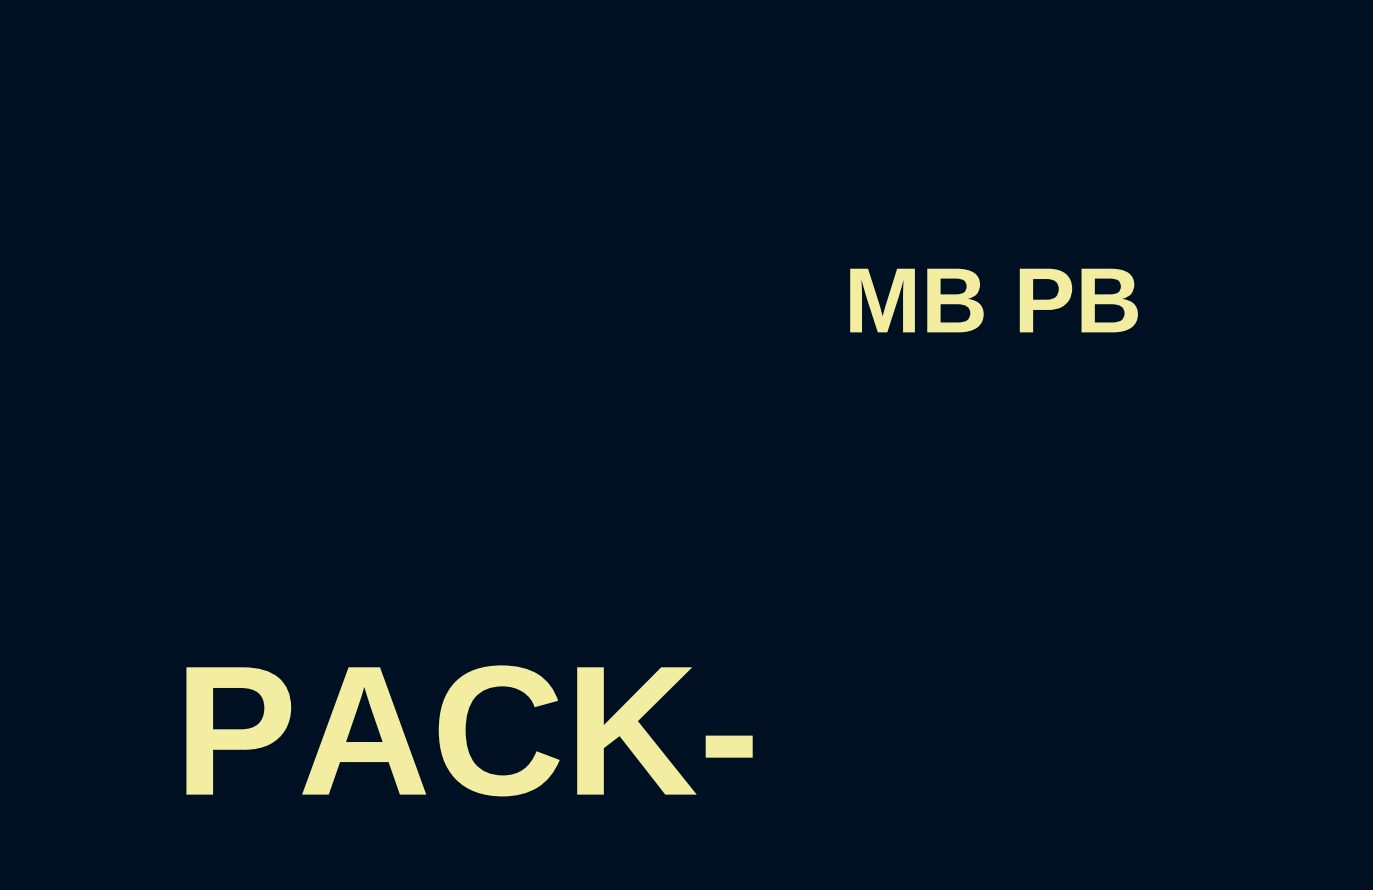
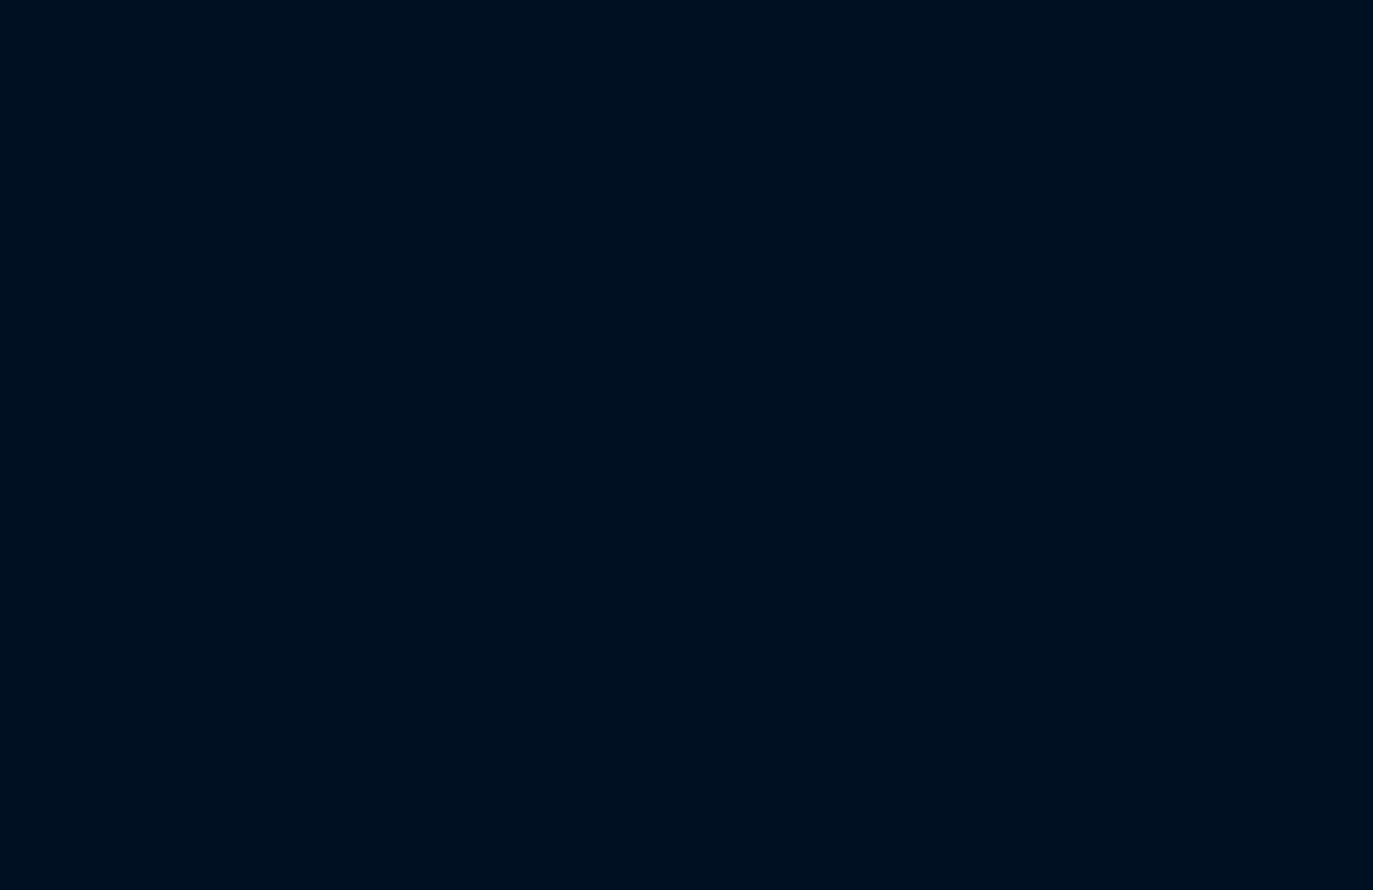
text: MB PB (994, 300) -> none
text: PACK- (469, 730) -> none

